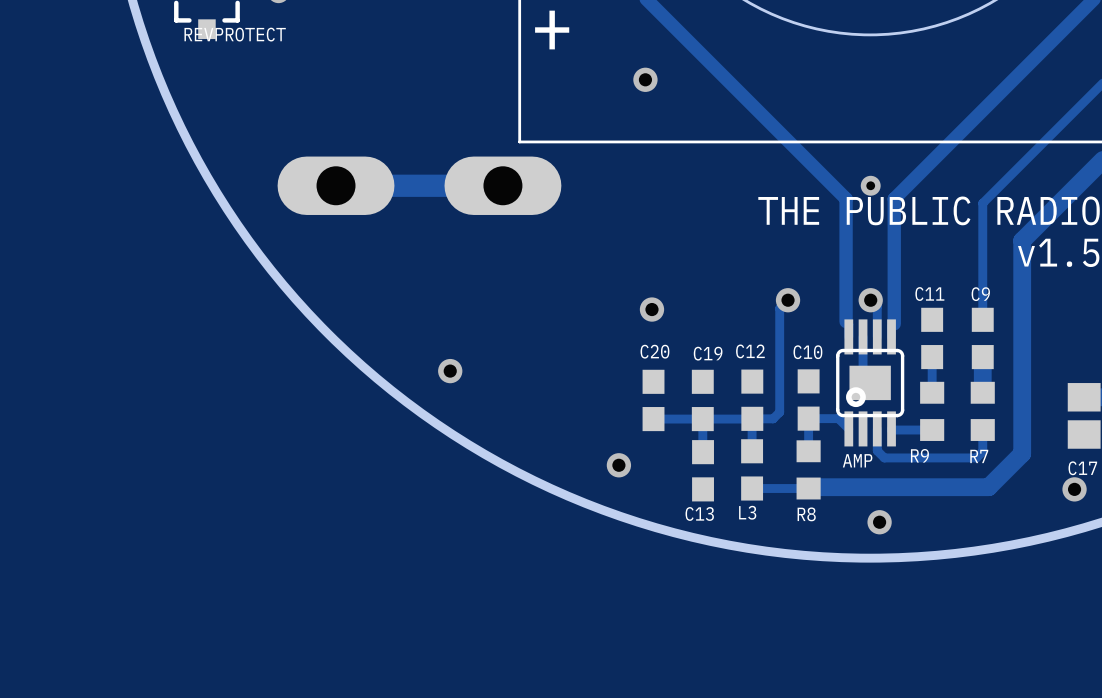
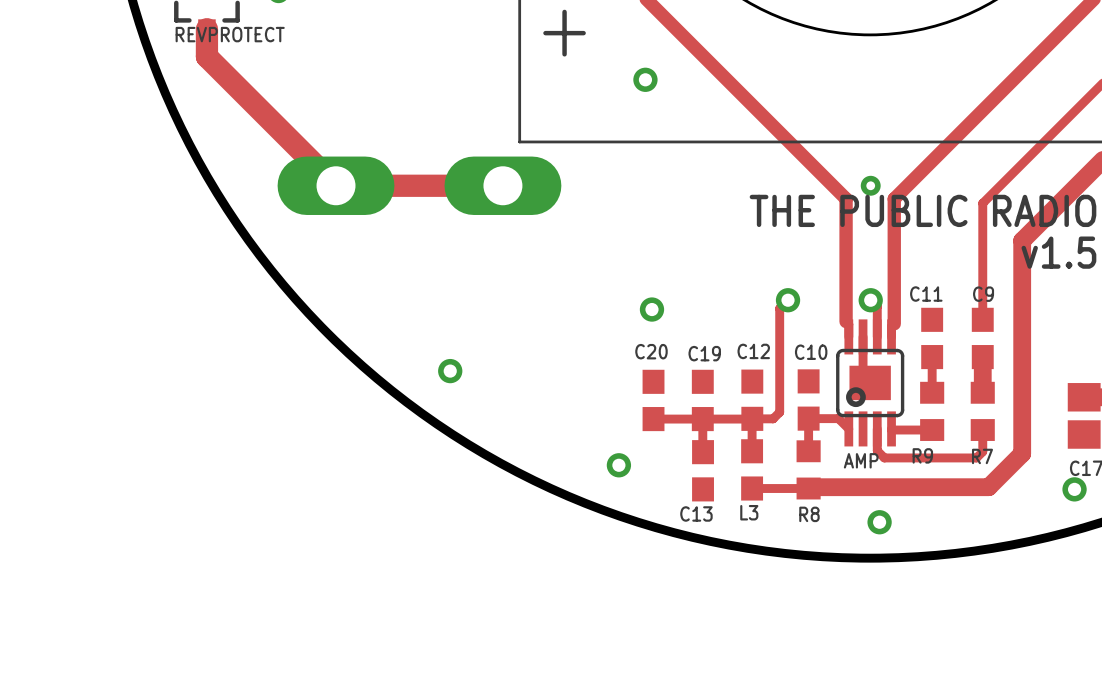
track: none -> (206, 29) (206, 56) (336, 185)

